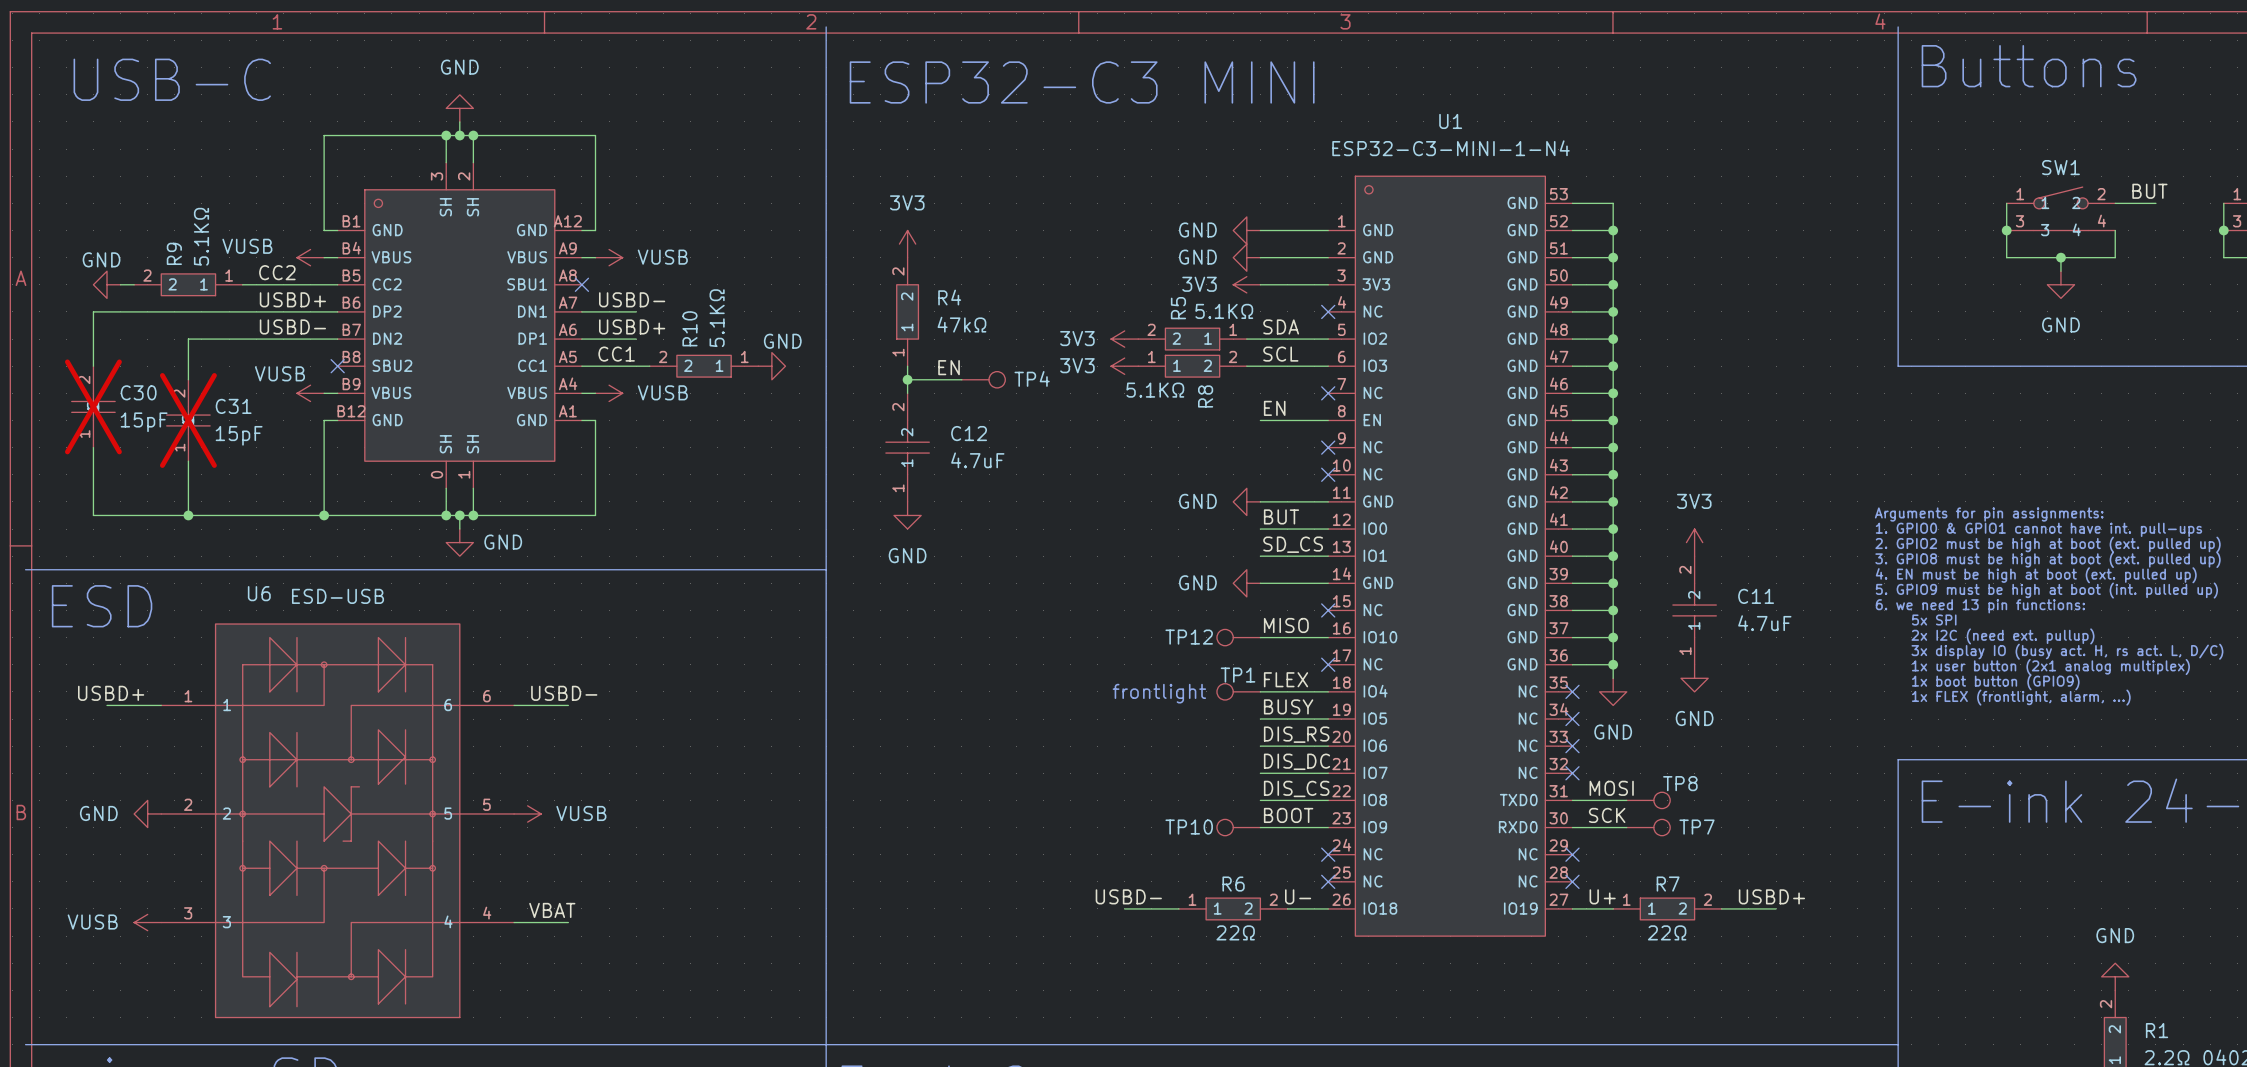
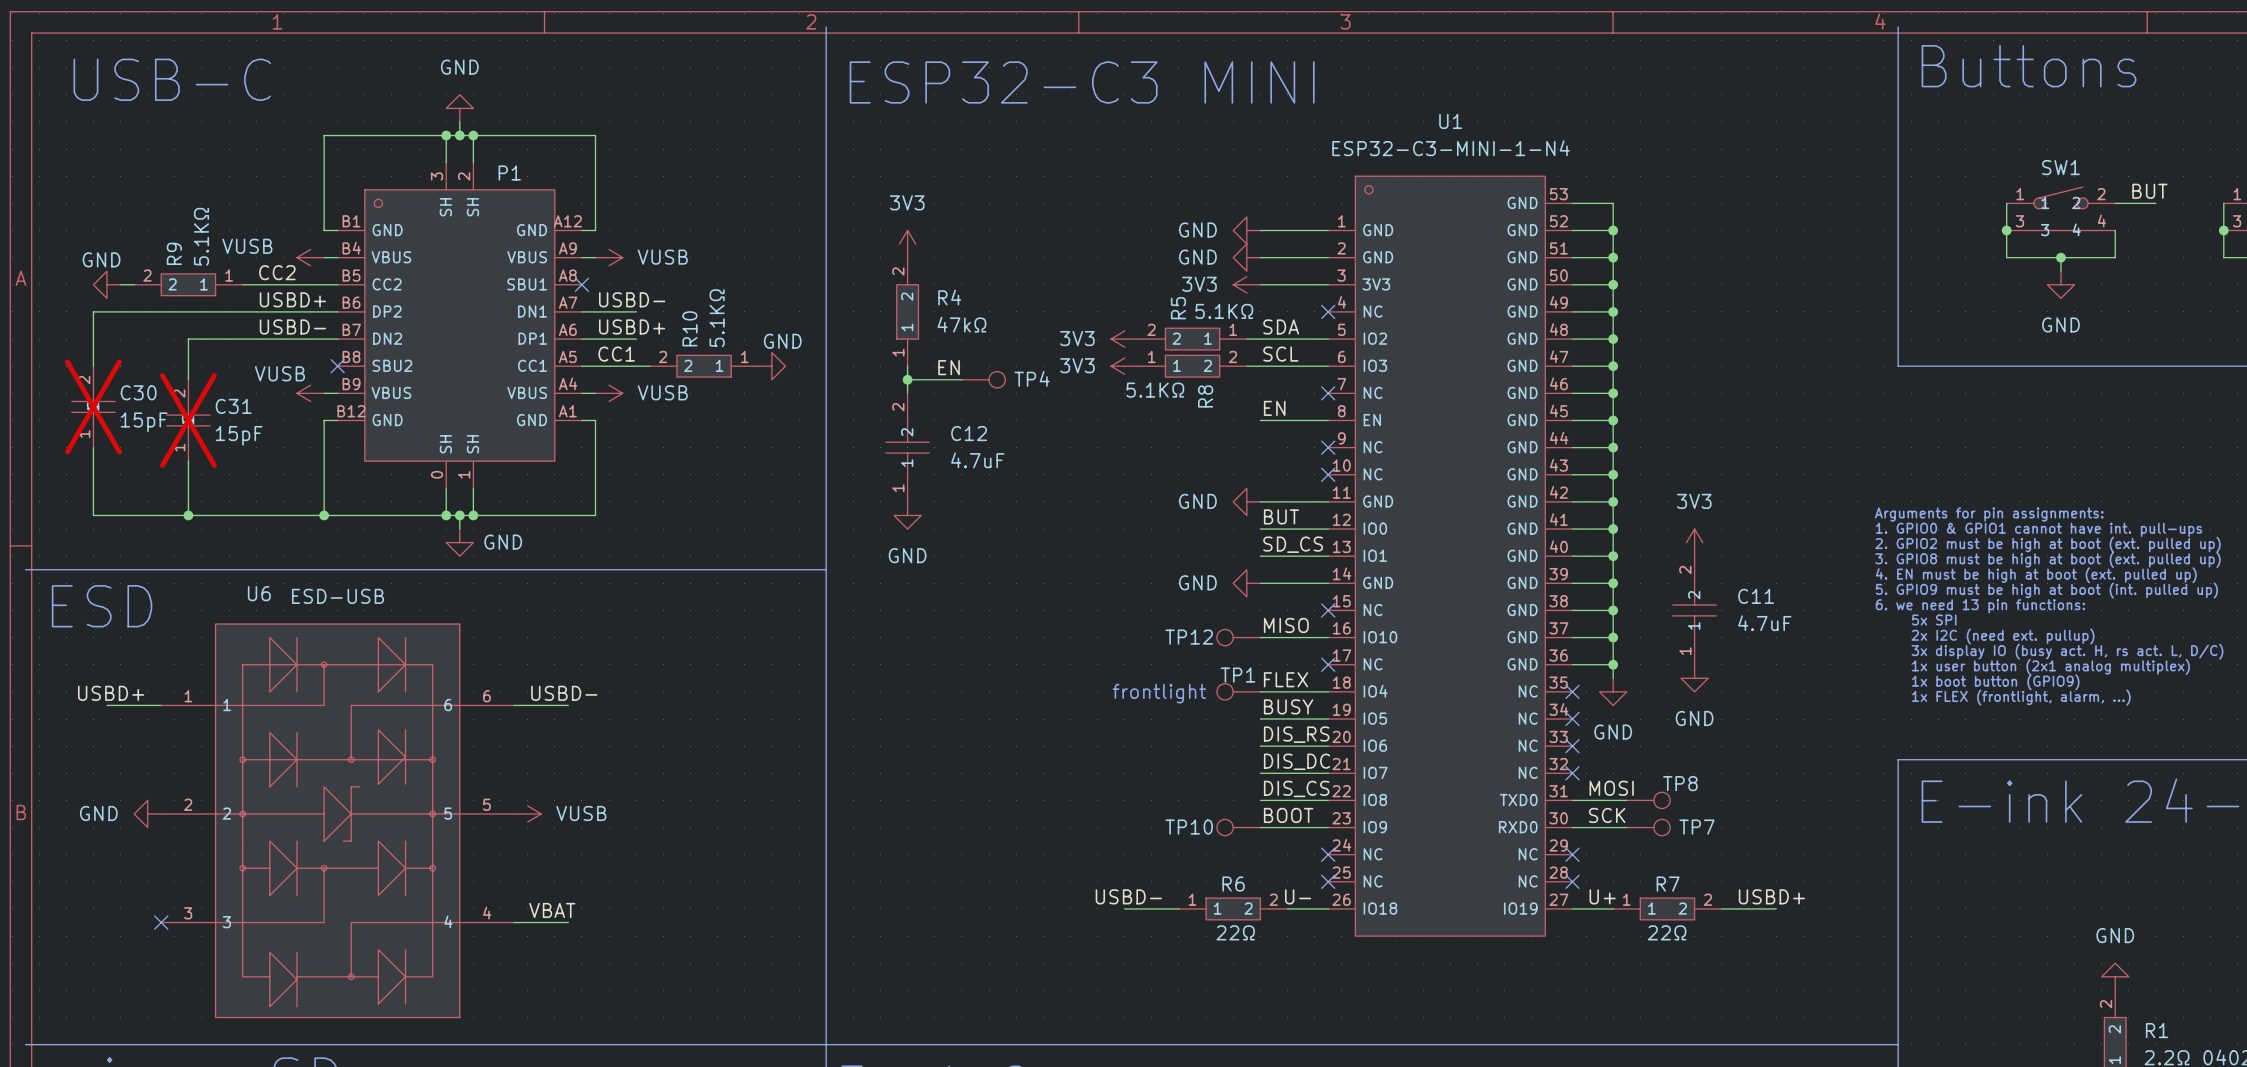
P1 name: none -> P1 (509, 173)
power symbol: VUSB (147, 922) -> none
no-connect mark: none -> (161, 922)

